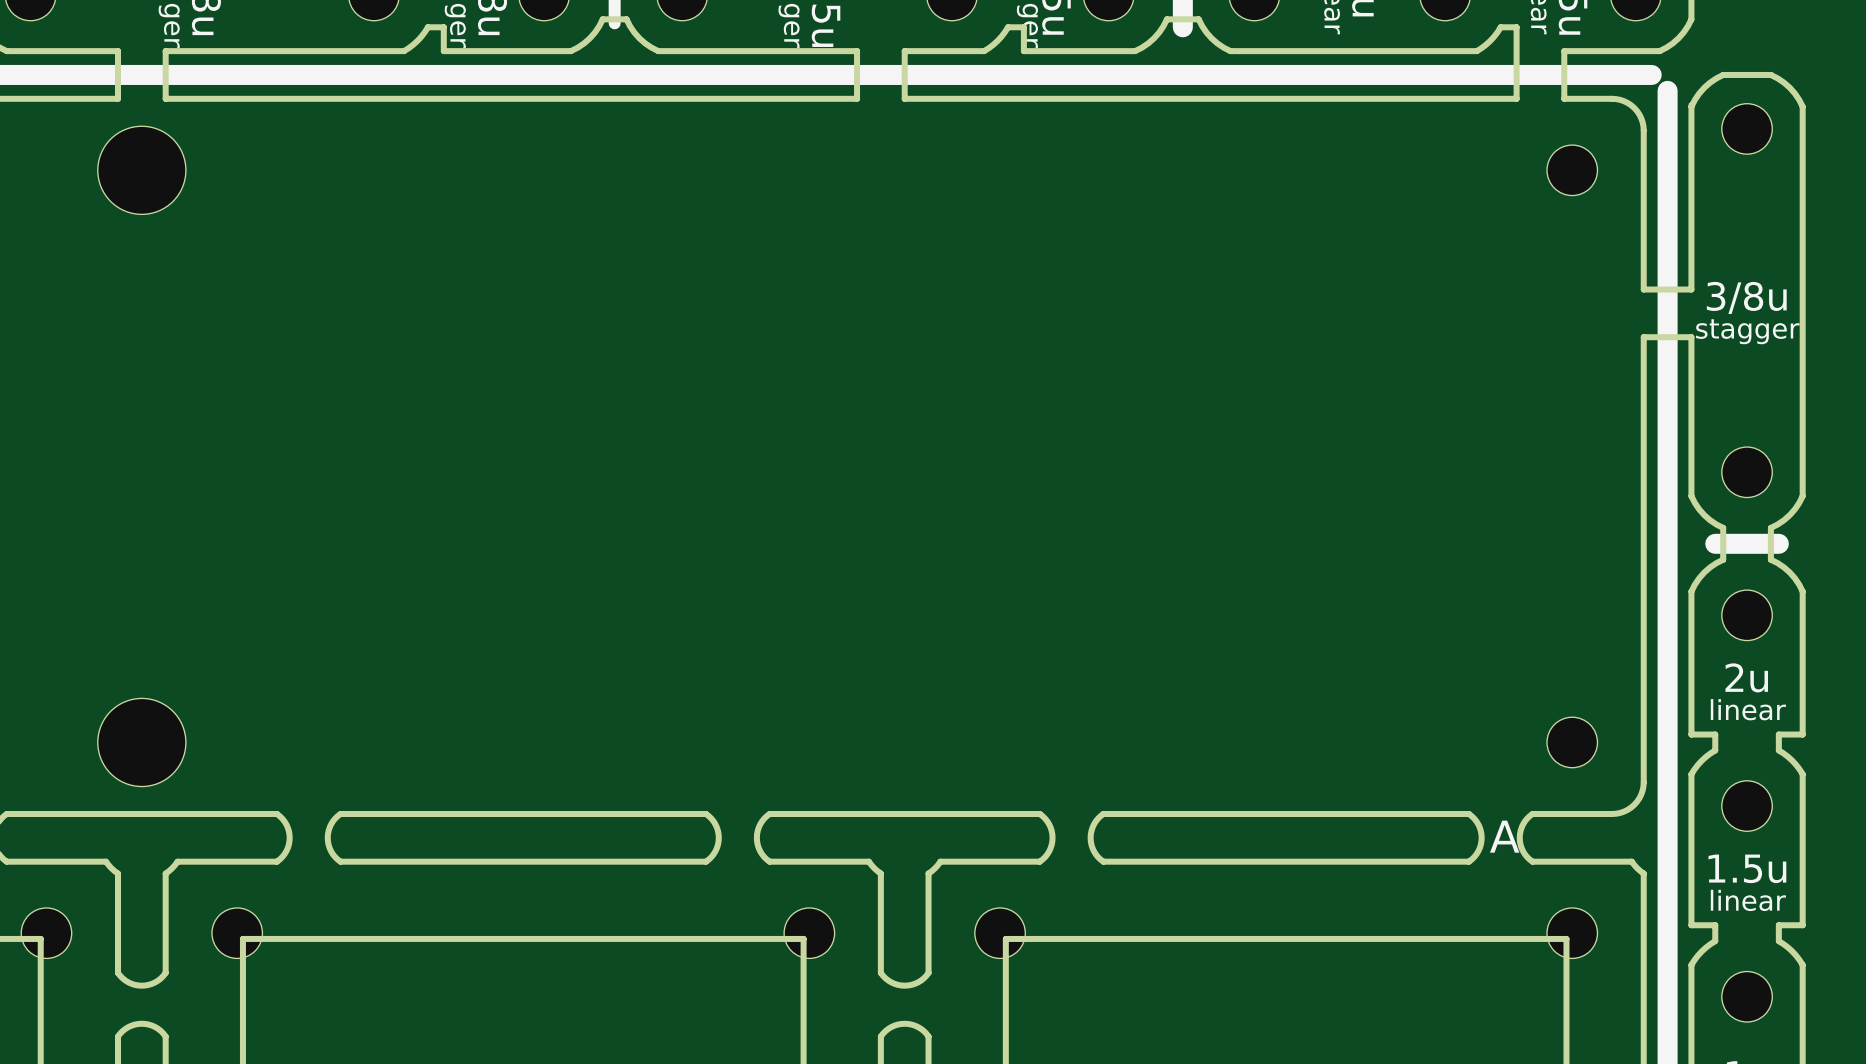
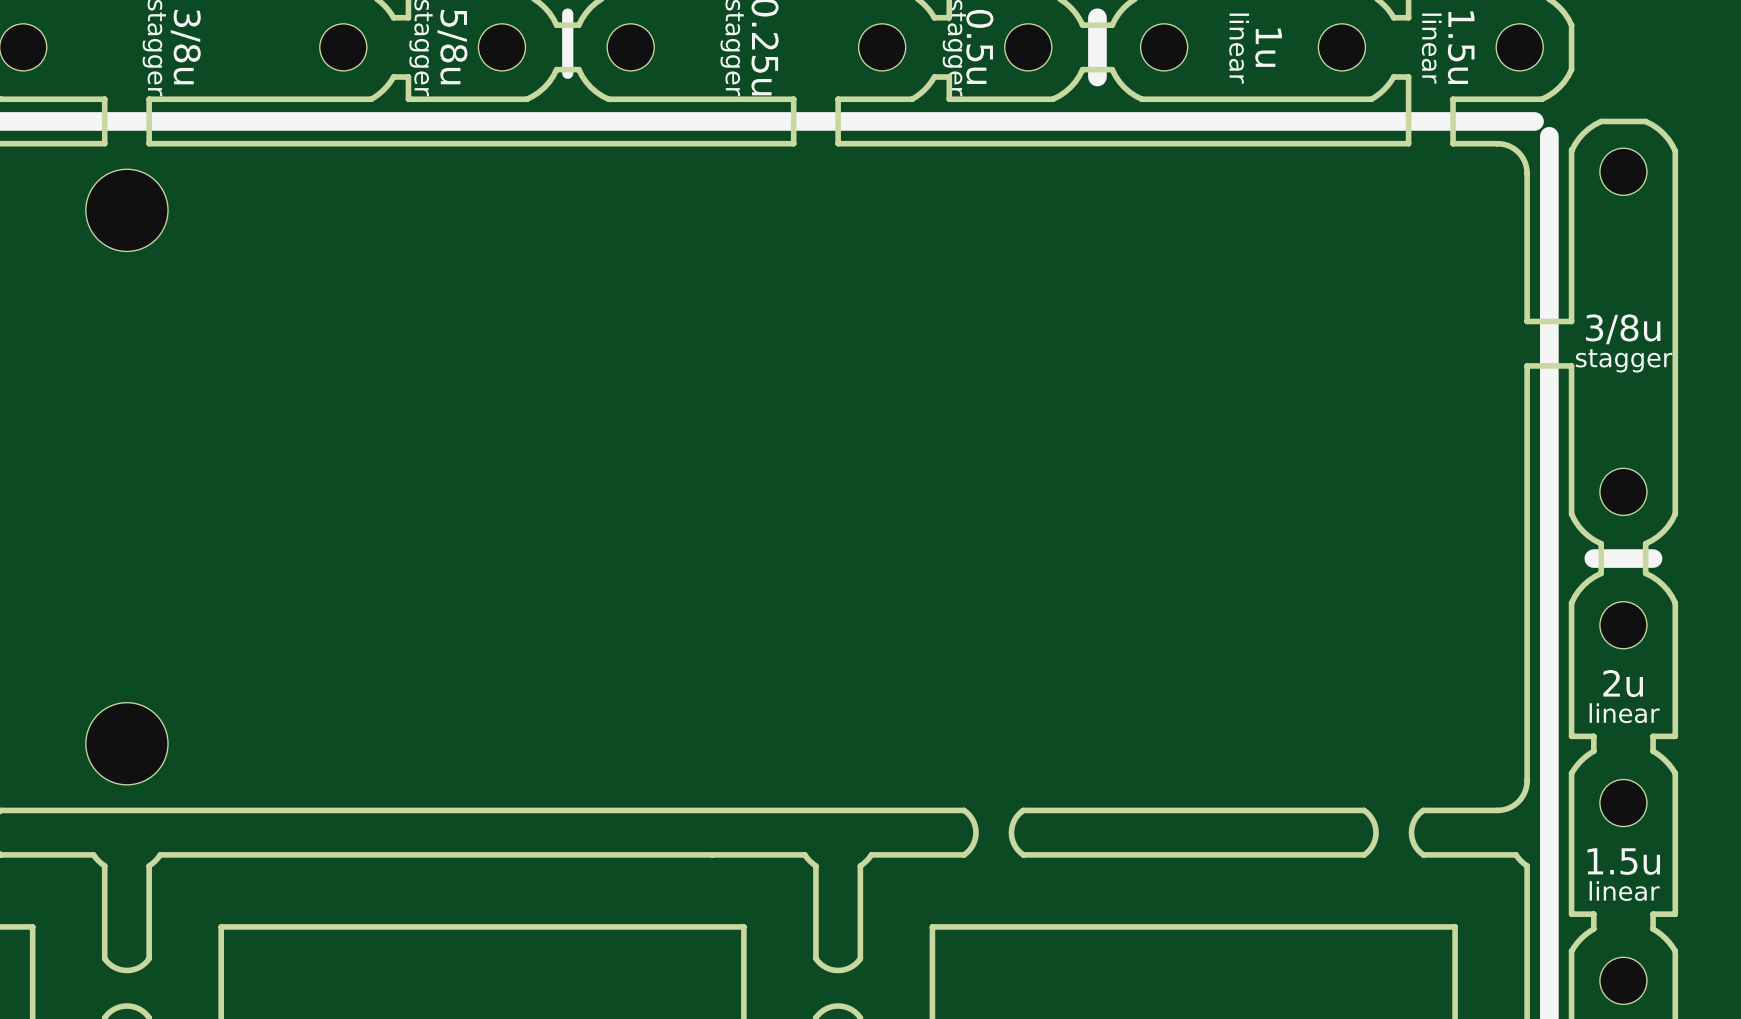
part: (1572, 170) -> none
part: (1572, 742) -> none
board edge: (276, 814) (286, 824) (289, 837) (286, 851) (276, 861) -> (312, 854) (252, 854)
board edge: (340, 814) (331, 824) (327, 837) (331, 851) (340, 861) -> (312, 810) (252, 810)
board edge: (706, 814) (715, 824) (718, 837) (715, 851) (706, 861) -> (712, 854) (652, 854)
board edge: (769, 814) (760, 824) (756, 837) (760, 851) (769, 861) -> (712, 810) (652, 810)
text: A (1504, 836) -> none
part: (46, 933) -> none
part: (237, 933) -> none
part: (809, 933) -> none
part: (1000, 933) -> none
part: (1572, 933) -> none

